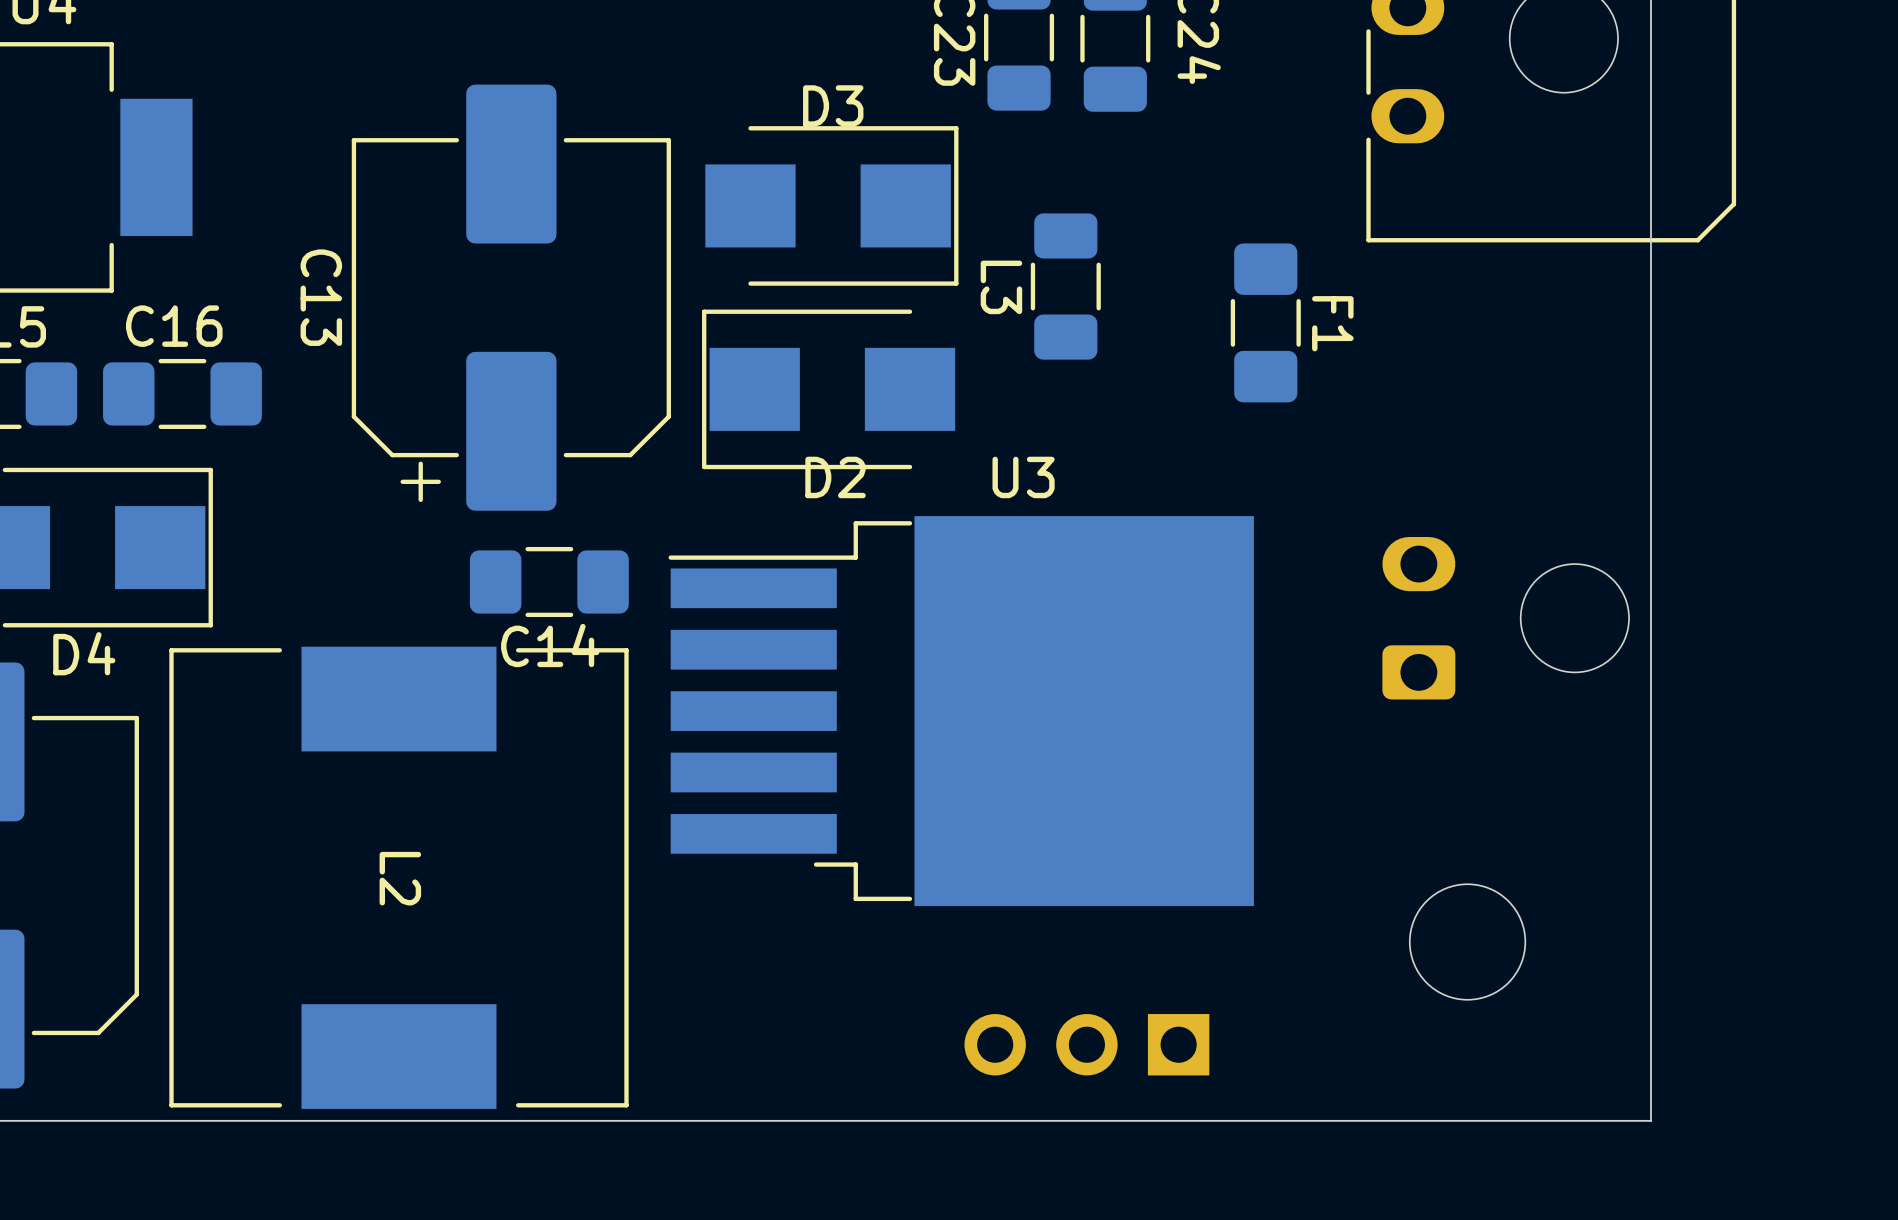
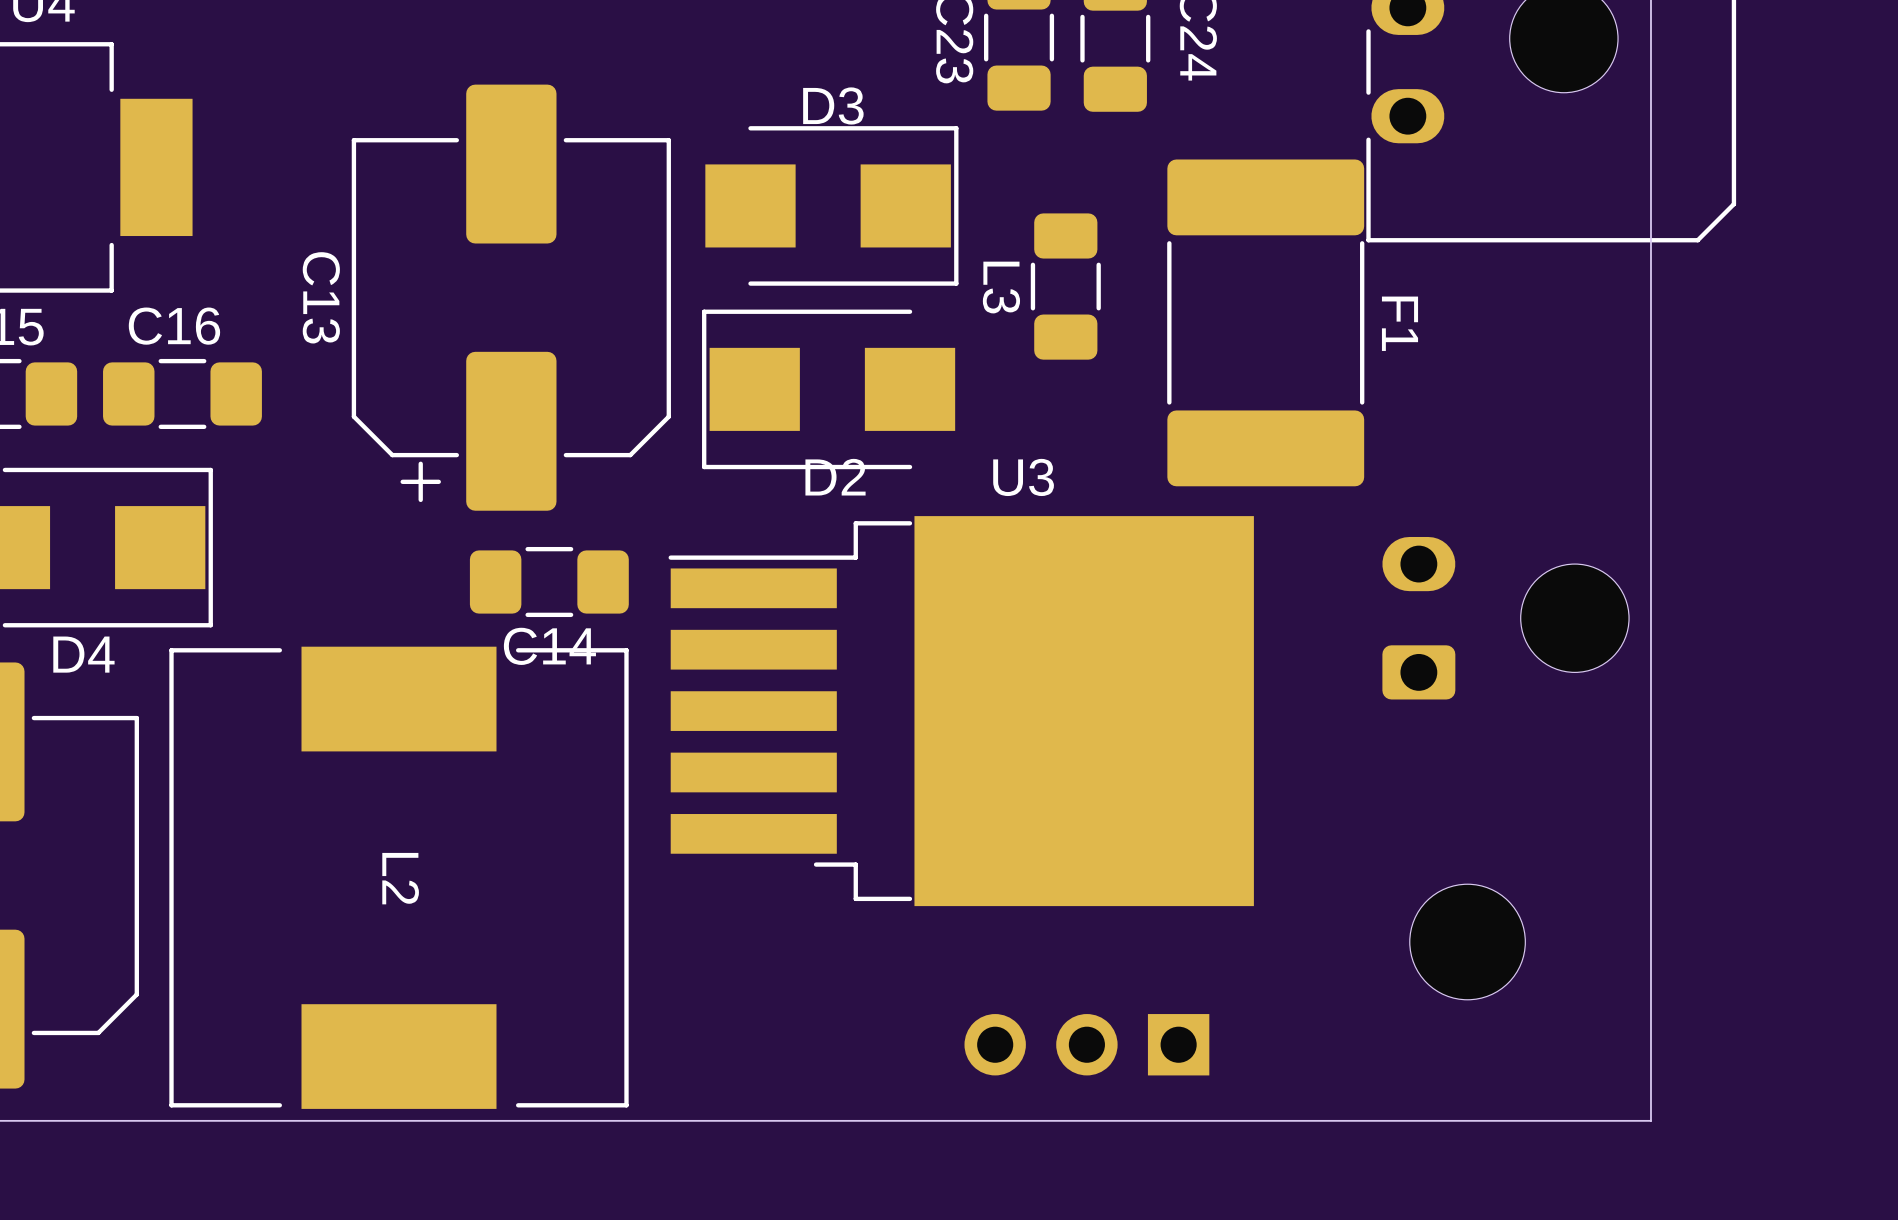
F1 footprint: [1230, 243, 1301, 403] -> [1167, 159, 1365, 487]

